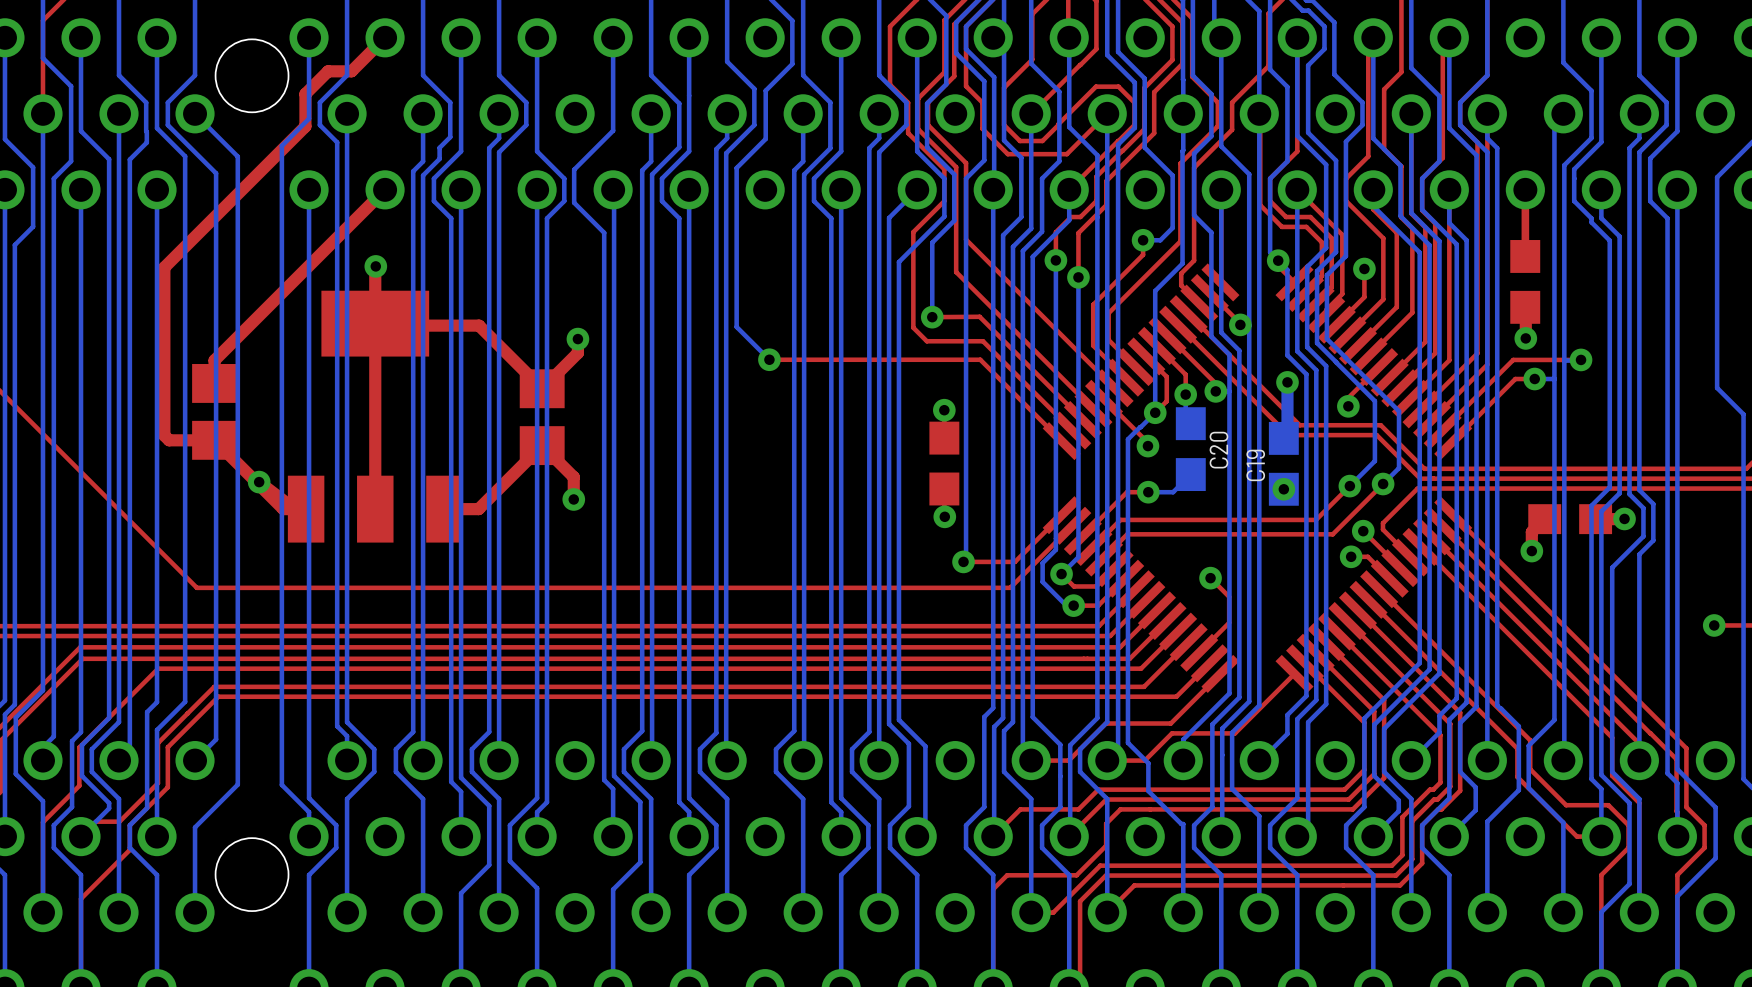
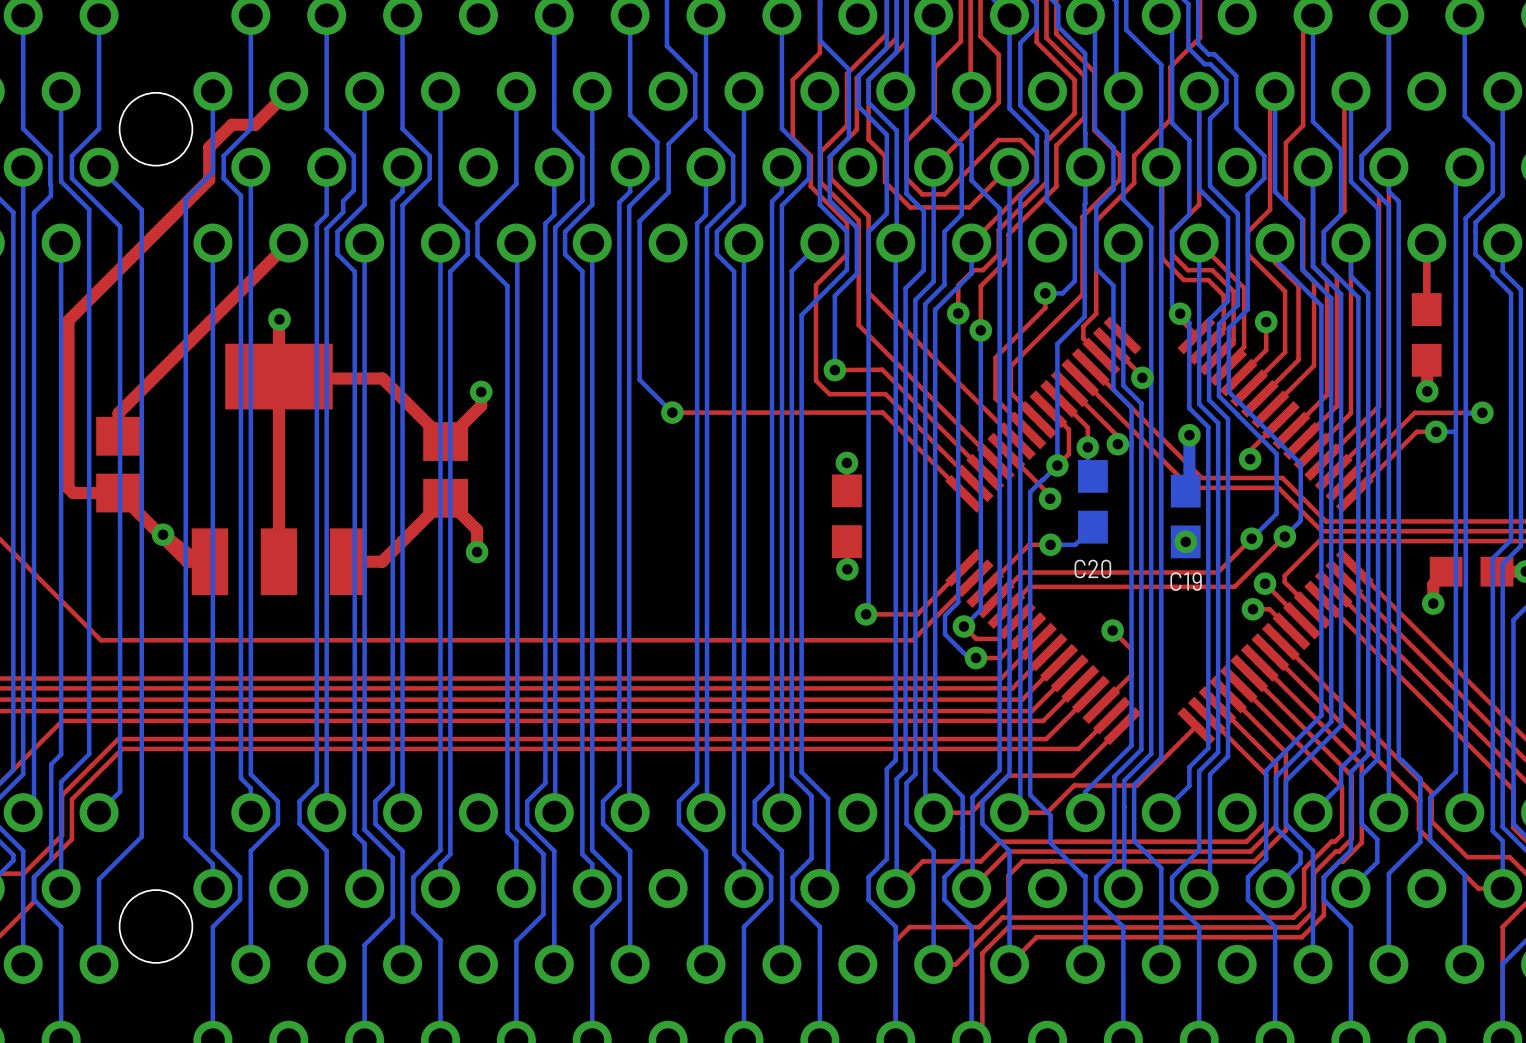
C20 name rotation: 0° (1218, 450) -> 90° clockwise (1092, 569)
C20 name position: C20 (1218, 450) -> C20 (1092, 569)
C19 name rotation: 0° (1255, 465) -> 90° clockwise (1186, 581)
C19 name position: C19 (1255, 465) -> C19 (1186, 581)

